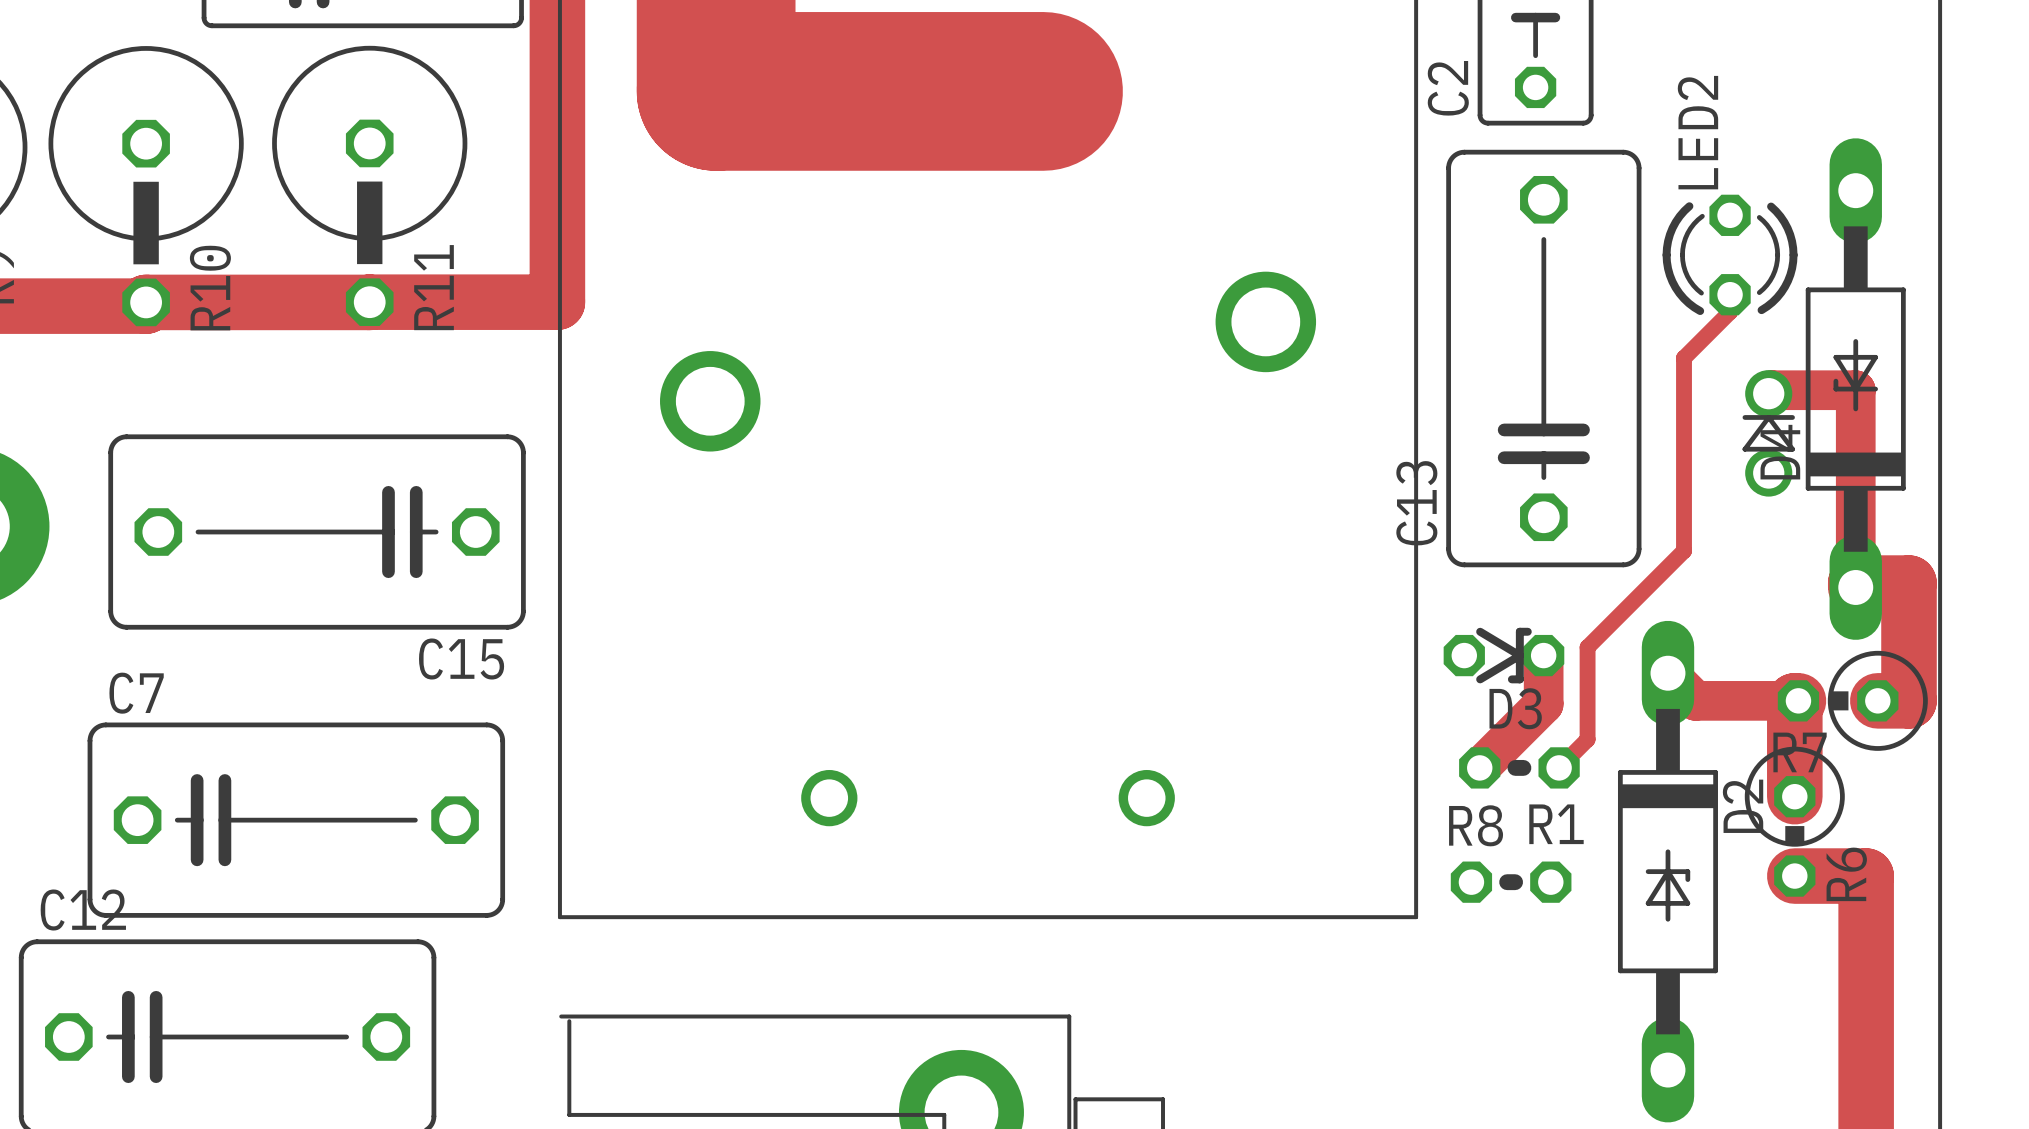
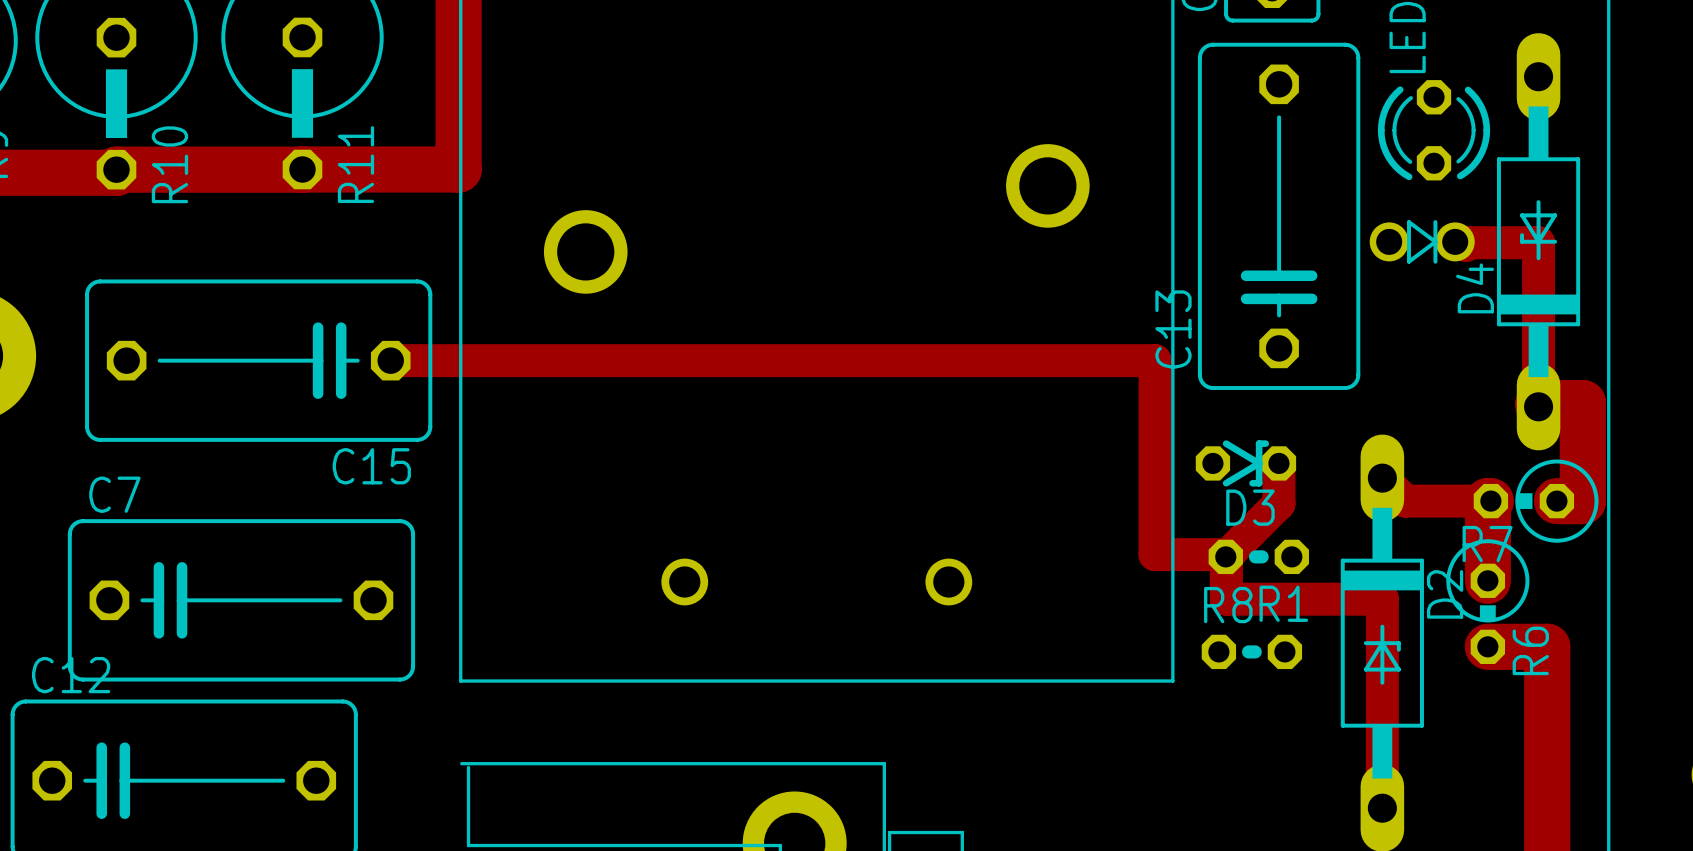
track: (1730, 294) (1730, 312) (1684, 358) (1684, 550) (1587, 647) (1587, 739) (1559, 767) -> none
part rotation: 0° (1768, 433) -> 90° clockwise (1422, 241)
track: none -> (390, 360) (1155, 360) (1155, 554) (1225, 554) (1226, 599) (1382, 599) (1382, 808)

